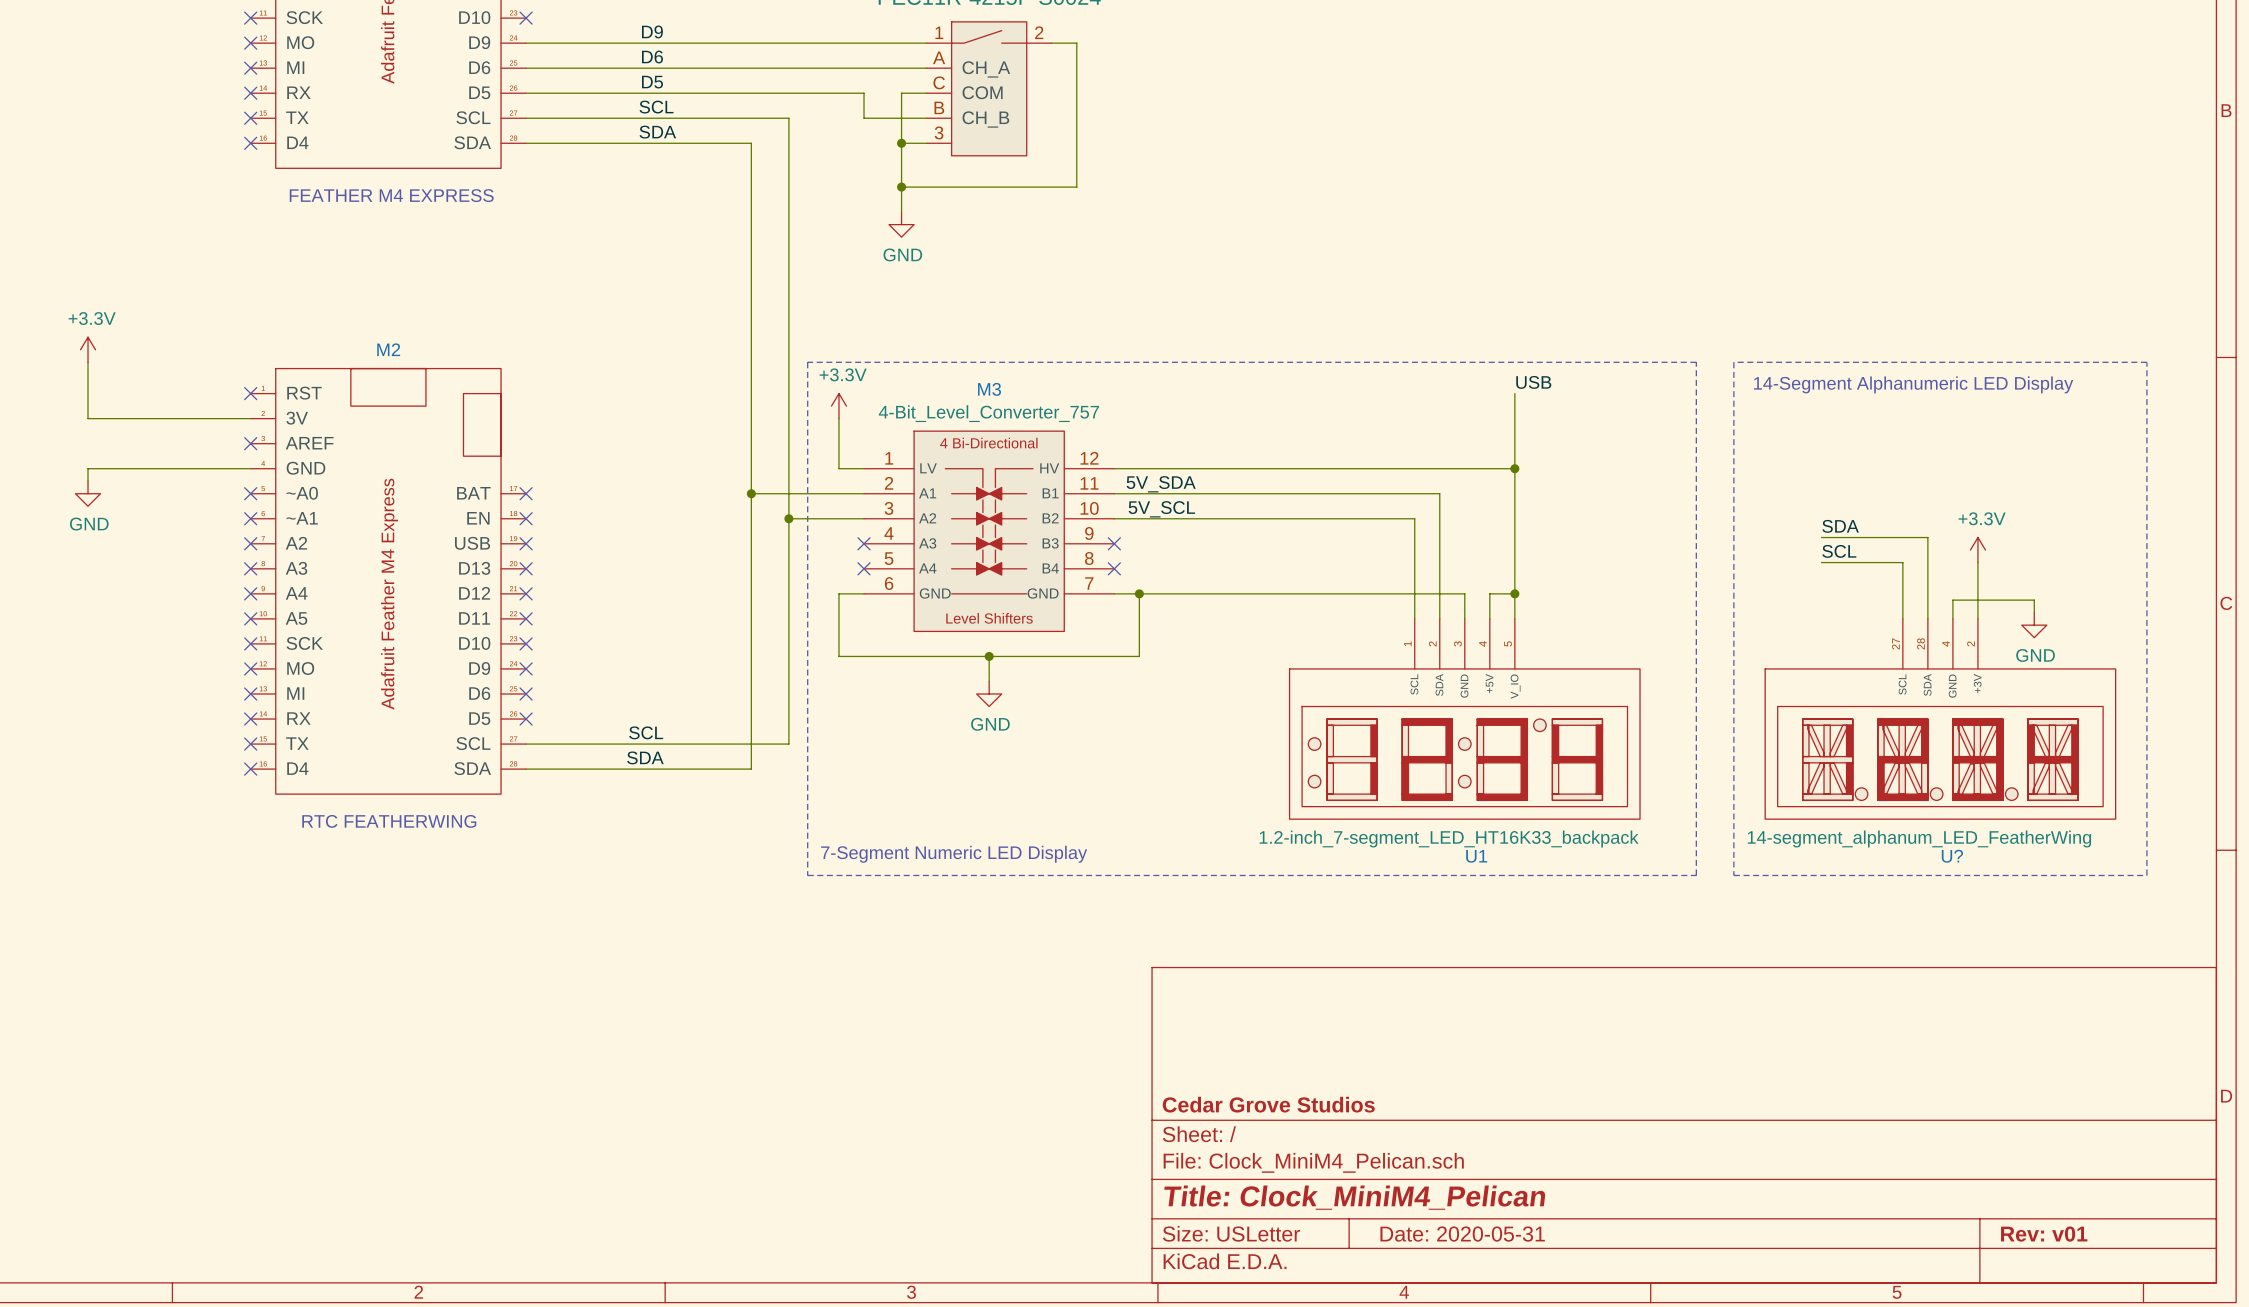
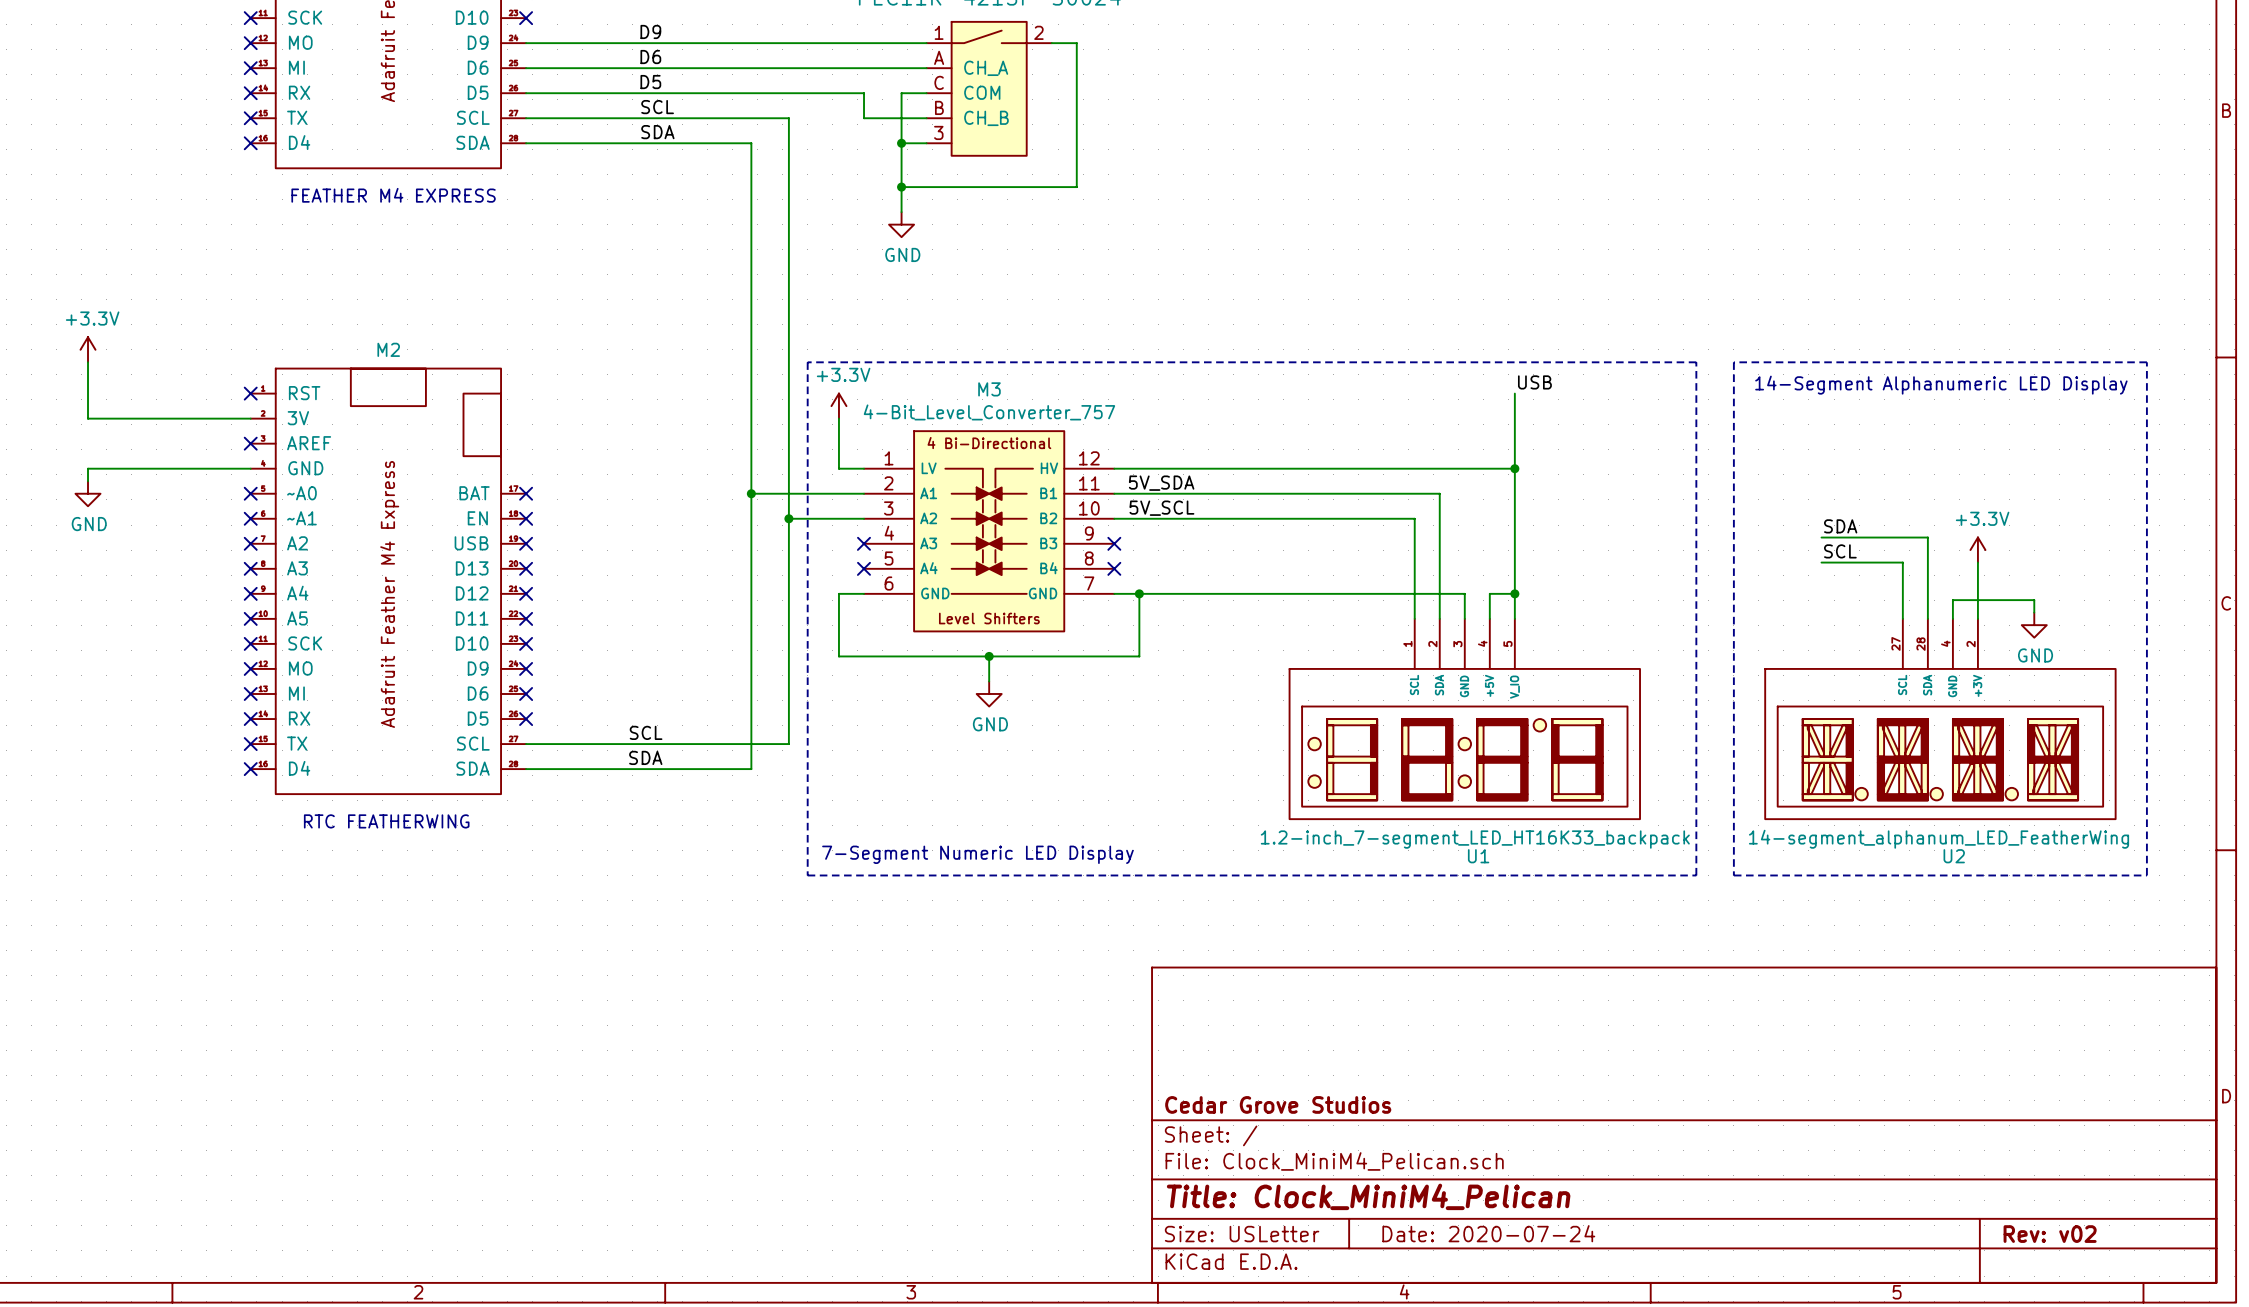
U? name: U? (1952, 856) -> U2 (1954, 856)
title block: Date: 2020-05-31 (1462, 1234) -> Date: 2020-07-24 (1488, 1233)
title block: Rev: v01 (2044, 1234) -> Rev: v02 (2050, 1234)

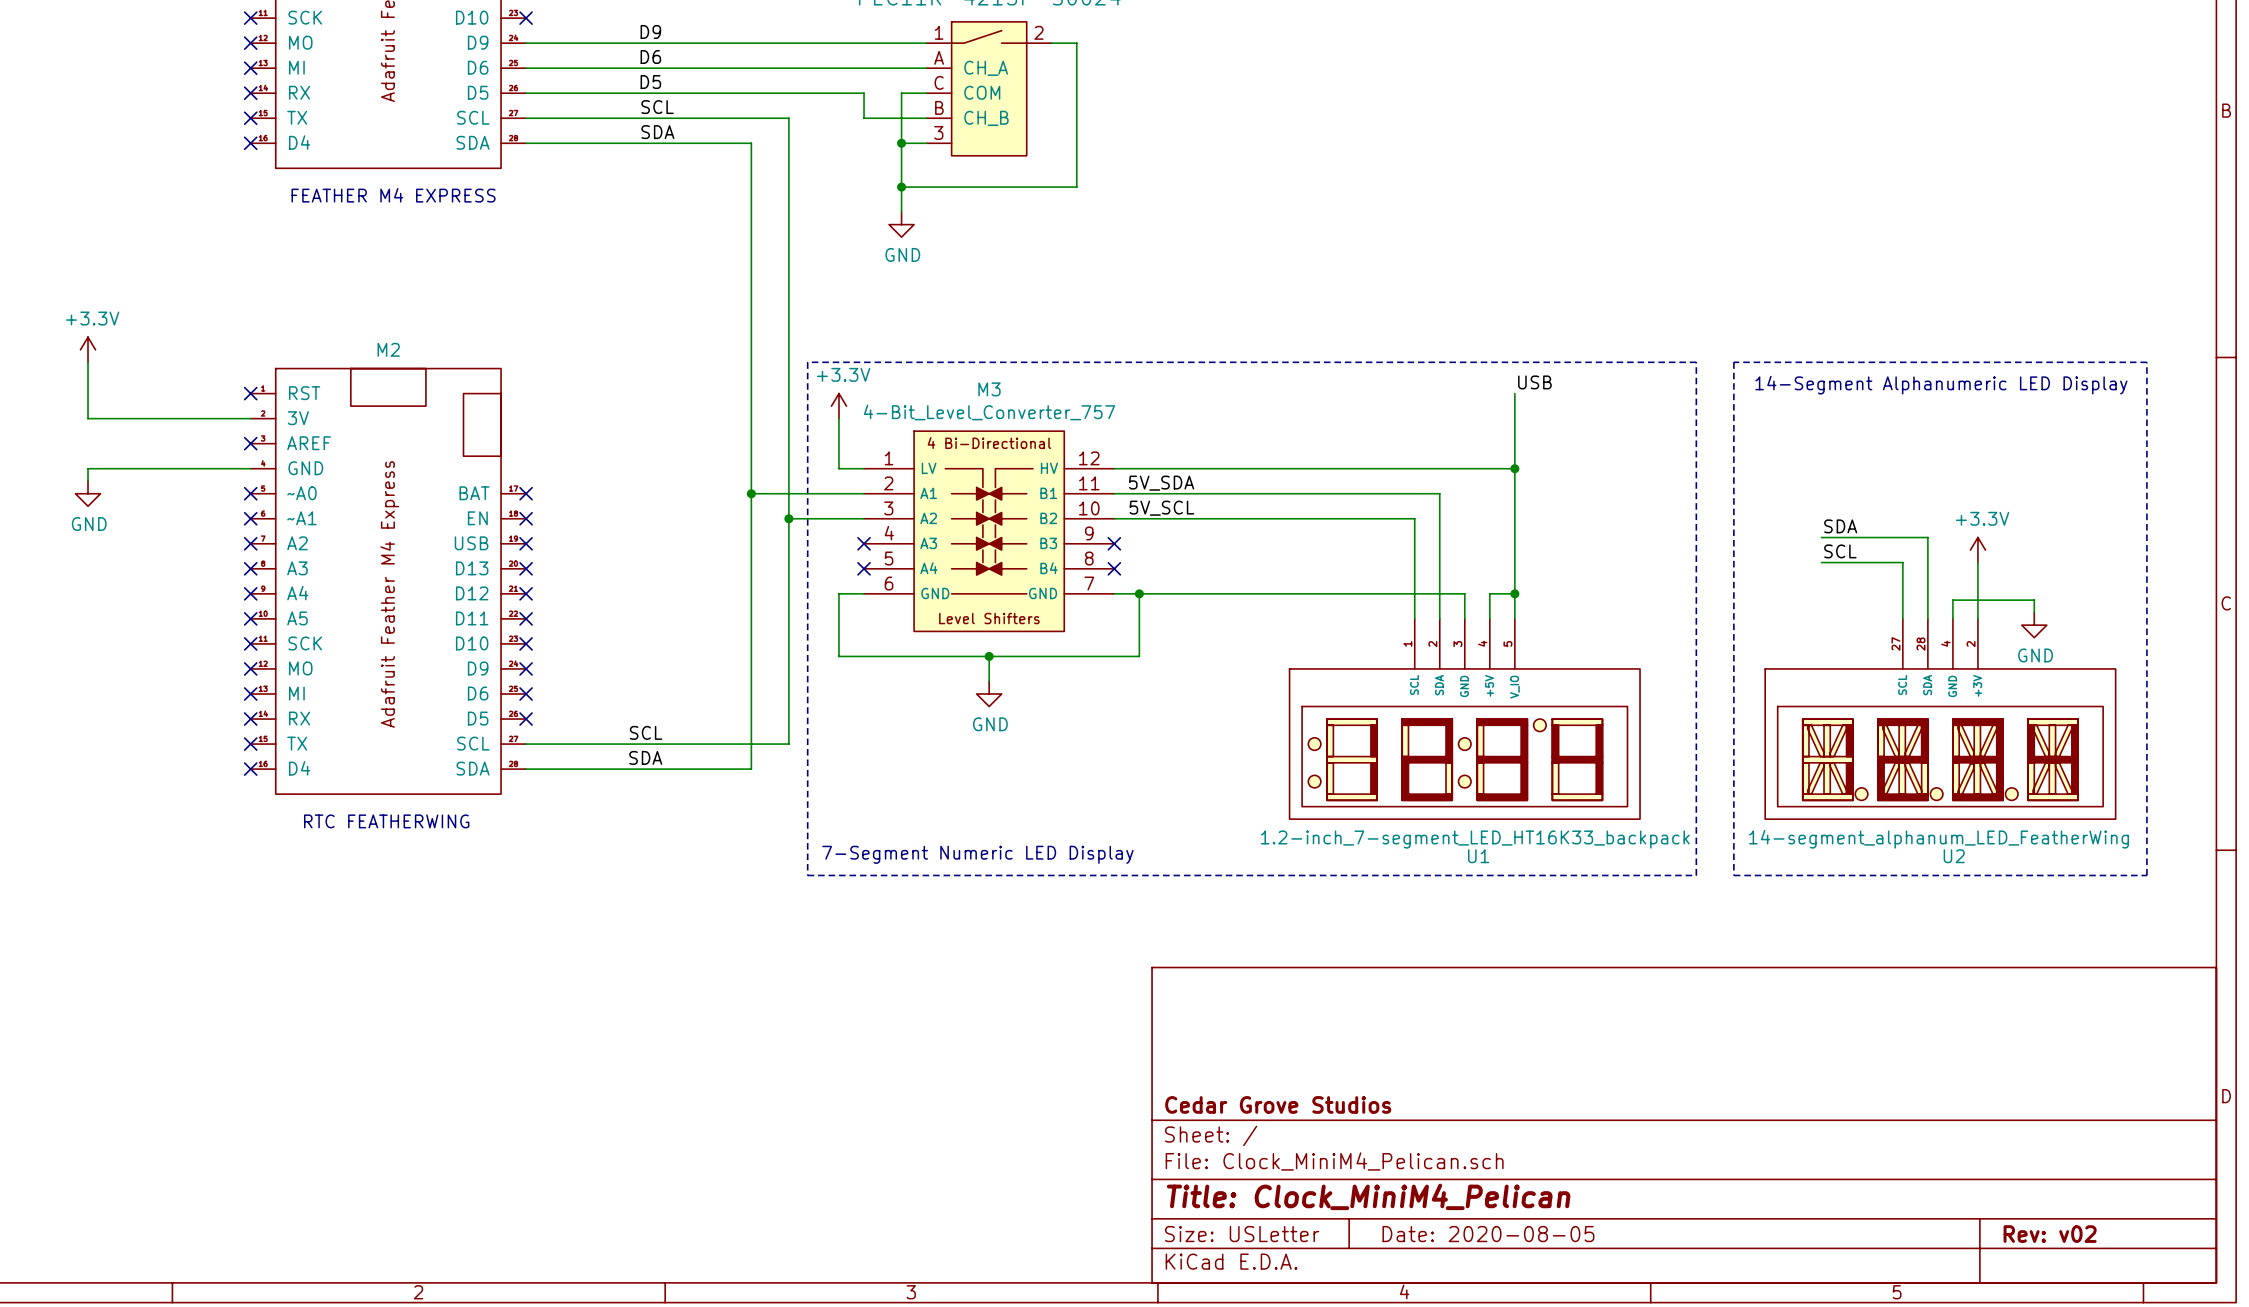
title block: Date: 2020-07-24 (1488, 1233) -> Date: 2020-08-05 (1488, 1234)

